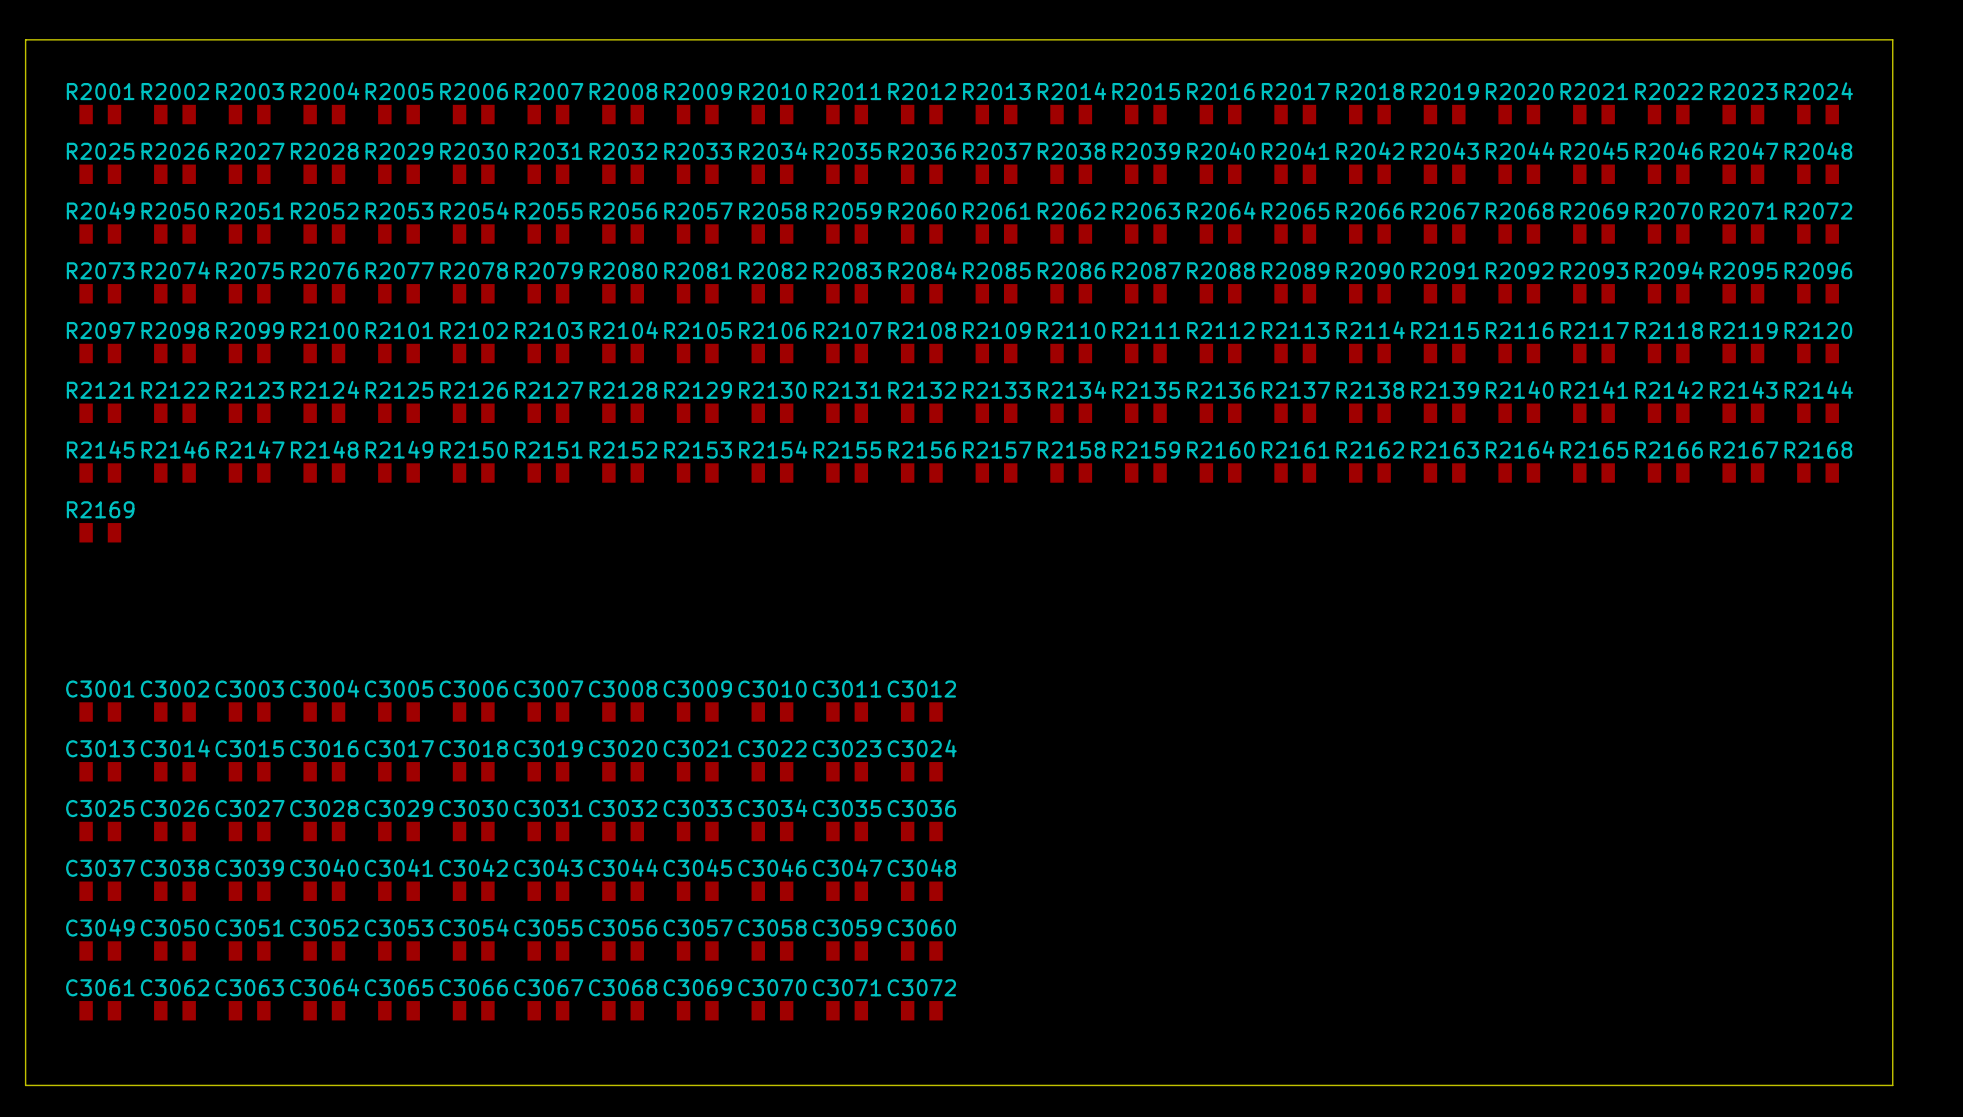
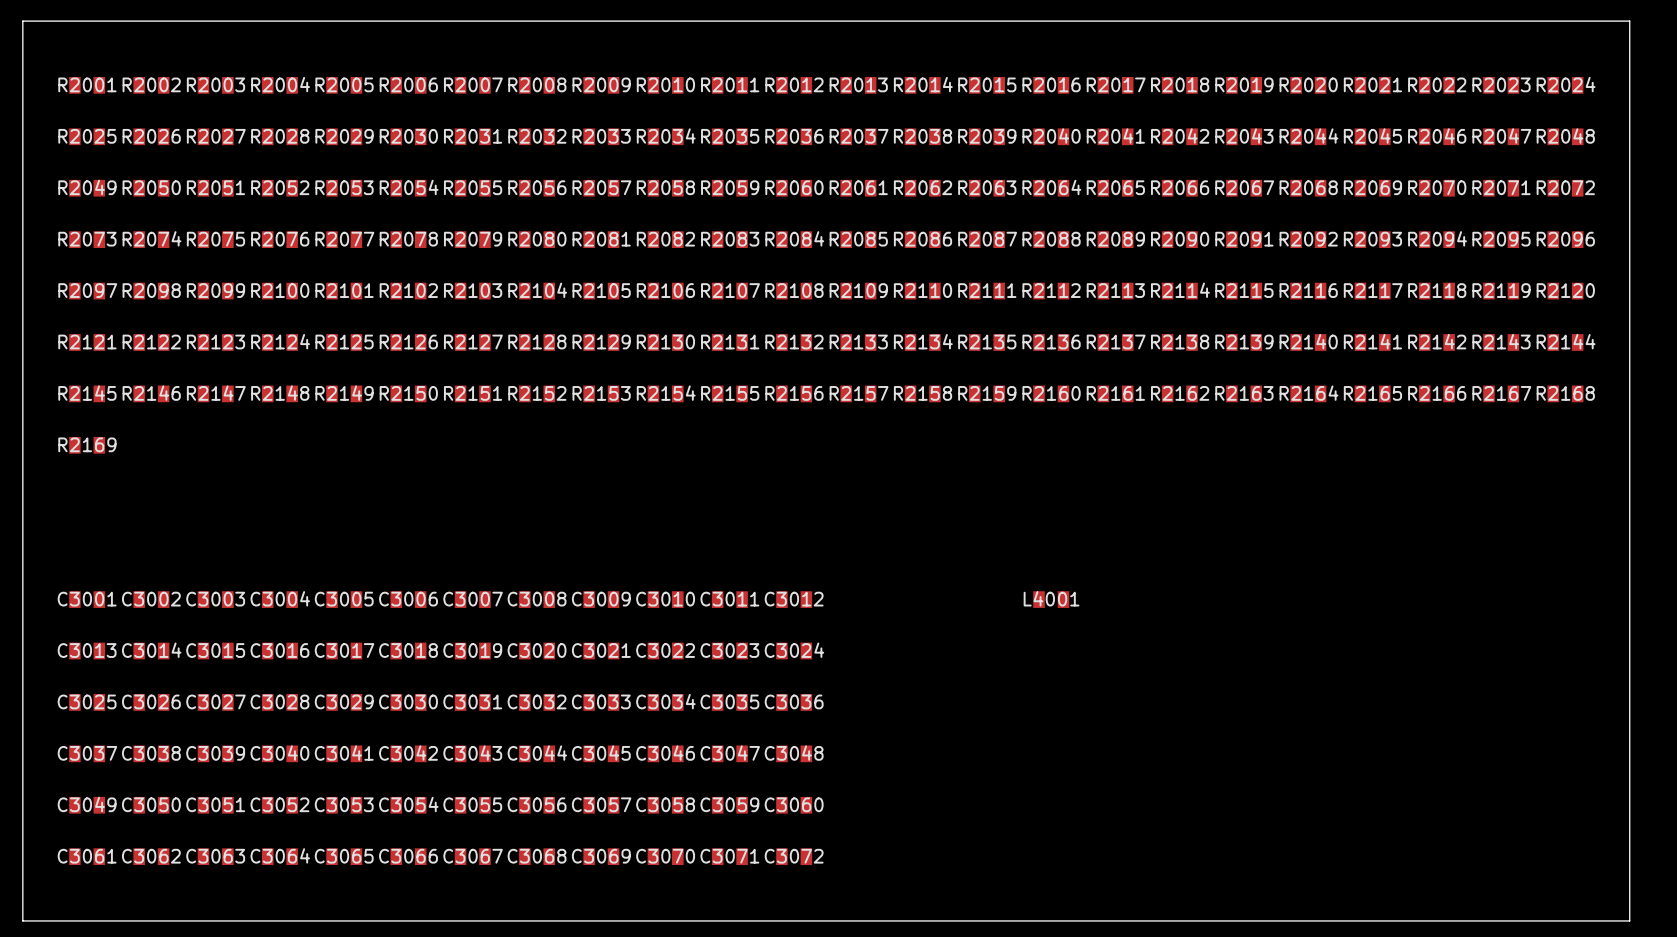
R2001 name position: R2001 (100, 91) -> R2001 (87, 84)
R2002 name position: R2002 (175, 91) -> R2002 (151, 84)
R2003 name position: R2003 (250, 91) -> R2003 (215, 84)
R2004 name position: R2004 (325, 91) -> R2004 (280, 84)
R2005 name position: R2005 (399, 91) -> R2005 (344, 84)
R2006 name position: R2006 (474, 91) -> R2006 (408, 84)
R2007 name position: R2007 (549, 91) -> R2007 (473, 84)
R2008 name position: R2008 (623, 91) -> R2008 (537, 84)
R2009 name position: R2009 (698, 91) -> R2009 (601, 84)
R2010 name position: R2010 (772, 91) -> R2010 (665, 84)
R2011 name position: R2011 (847, 91) -> R2011 (730, 84)
R2012 name position: R2012 (922, 91) -> R2012 (794, 84)
R2013 name position: R2013 (996, 91) -> R2013 (858, 84)
R2014 name position: R2014 (1071, 91) -> R2014 (923, 84)
R2015 name position: R2015 (1146, 91) -> R2015 (987, 84)
R2016 name position: R2016 (1220, 91) -> R2016 (1051, 84)
R2017 name position: R2017 (1295, 91) -> R2017 (1116, 84)
R2018 name position: R2018 (1370, 91) -> R2018 (1180, 84)
R2019 name position: R2019 (1444, 91) -> R2019 (1244, 84)
R2020 name position: R2020 (1519, 91) -> R2020 (1308, 84)
R2021 name position: R2021 (1594, 91) -> R2021 (1372, 84)
R2022 name position: R2022 (1669, 91) -> R2022 (1437, 84)
R2023 name position: R2023 (1743, 91) -> R2023 (1501, 84)
R2024 name position: R2024 (1818, 91) -> R2024 (1566, 84)
R2034 name position: R2034 (773, 150) -> R2034 (666, 136)
R2040 name position: R2040 (1220, 150) -> R2040 (1051, 136)
R2041 name position: R2041 (1295, 150) -> R2041 (1115, 136)
R2042 name position: R2042 (1370, 150) -> R2042 (1180, 136)
R2043 name position: R2043 (1444, 150) -> R2043 (1244, 136)
R2044 name position: R2044 (1520, 150) -> R2044 (1308, 136)
R2045 name position: R2045 (1594, 150) -> R2045 (1372, 136)
R2046 name position: R2046 (1669, 150) -> R2046 (1437, 136)
R2047 name position: R2047 (1744, 150) -> R2047 (1501, 136)
R2048 name position: R2048 (1818, 150) -> R2048 (1565, 136)
R2025 name position: R2025 (100, 151) -> R2025 (87, 136)
R2026 name position: R2026 (175, 151) -> R2026 (151, 136)
R2027 name position: R2027 (250, 151) -> R2027 (216, 136)
R2028 name position: R2028 (324, 151) -> R2028 (280, 136)
R2029 name position: R2029 (399, 151) -> R2029 (344, 136)
R2030 name position: R2030 (474, 151) -> R2030 (408, 136)
R2031 name position: R2031 (548, 151) -> R2031 (473, 136)
R2032 name position: R2032 (623, 151) -> R2032 (537, 136)
R2033 name position: R2033 (698, 151) -> R2033 (601, 136)
R2035 name position: R2035 (847, 151) -> R2035 (730, 136)
R2036 name position: R2036 (922, 151) -> R2036 (794, 136)
R2037 name position: R2037 (997, 151) -> R2037 (859, 136)
R2038 name position: R2038 (1071, 151) -> R2038 (923, 136)
R2039 name position: R2039 (1146, 151) -> R2039 (987, 136)
R2049 name position: R2049 (100, 210) -> R2049 (87, 187)
R2054 name position: R2054 (474, 210) -> R2054 (409, 187)
R2064 name position: R2064 (1221, 210) -> R2064 (1051, 187)
R2050 name position: R2050 (175, 211) -> R2050 (151, 187)
R2051 name position: R2051 (250, 211) -> R2051 (215, 187)
R2052 name position: R2052 (324, 211) -> R2052 (280, 187)
R2053 name position: R2053 (399, 211) -> R2053 (344, 187)
R2055 name position: R2055 (548, 211) -> R2055 (473, 187)
R2056 name position: R2056 (623, 211) -> R2056 (537, 187)
R2057 name position: R2057 (698, 211) -> R2057 (601, 187)
R2058 name position: R2058 (772, 211) -> R2058 (665, 187)
R2059 name position: R2059 (847, 211) -> R2059 (730, 187)
R2060 name position: R2060 (922, 211) -> R2060 (794, 187)
R2061 name position: R2061 (996, 211) -> R2061 (858, 187)
R2062 name position: R2062 (1071, 211) -> R2062 (923, 187)
R2063 name position: R2063 (1146, 211) -> R2063 (987, 187)
R2065 name position: R2065 (1295, 211) -> R2065 (1115, 187)
R2066 name position: R2066 (1370, 211) -> R2066 (1180, 187)
R2067 name position: R2067 (1445, 211) -> R2067 (1244, 187)
R2068 name position: R2068 (1519, 211) -> R2068 (1308, 187)
R2069 name position: R2069 (1594, 211) -> R2069 (1372, 187)
R2070 name position: R2070 (1669, 211) -> R2070 (1437, 187)
R2071 name position: R2071 (1743, 211) -> R2071 (1501, 187)
R2072 name position: R2072 (1818, 211) -> R2072 (1565, 187)
R2073 name position: R2073 (100, 270) -> R2073 (87, 239)
R2074 name position: R2074 (175, 270) -> R2074 (152, 238)
R2075 name position: R2075 (250, 270) -> R2075 (215, 239)
R2076 name position: R2076 (324, 270) -> R2076 (280, 239)
R2077 name position: R2077 (399, 270) -> R2077 (344, 239)
R2078 name position: R2078 (474, 270) -> R2078 (408, 239)
R2079 name position: R2079 (548, 270) -> R2079 (473, 239)
R2080 name position: R2080 (623, 270) -> R2080 (537, 239)
R2081 name position: R2081 (698, 270) -> R2081 (601, 239)
R2082 name position: R2082 (772, 270) -> R2082 (665, 239)
R2083 name position: R2083 (847, 270) -> R2083 (730, 239)
R2084 name position: R2084 (922, 270) -> R2084 (794, 238)
R2085 name position: R2085 (996, 270) -> R2085 (858, 239)
R2086 name position: R2086 (1071, 270) -> R2086 (923, 239)
R2087 name position: R2087 (1146, 270) -> R2087 (987, 239)
R2088 name position: R2088 (1220, 270) -> R2088 (1051, 239)
R2089 name position: R2089 (1295, 270) -> R2089 (1115, 239)
R2090 name position: R2090 (1370, 270) -> R2090 (1180, 239)
R2091 name position: R2091 (1444, 270) -> R2091 (1244, 239)
R2092 name position: R2092 (1519, 270) -> R2092 (1308, 239)
R2093 name position: R2093 (1594, 270) -> R2093 (1372, 239)
R2094 name position: R2094 (1669, 270) -> R2094 (1437, 238)
R2095 name position: R2095 (1743, 270) -> R2095 (1501, 239)
R2096 name position: R2096 (1818, 270) -> R2096 (1565, 239)
R2097 name position: R2097 (101, 330) -> R2097 (87, 290)
R2098 name position: R2098 (175, 330) -> R2098 (151, 290)
R2099 name position: R2099 (250, 330) -> R2099 (215, 290)
R2100 name position: R2100 (324, 330) -> R2100 (280, 290)
R2101 name position: R2101 (399, 330) -> R2101 (344, 290)
R2102 name position: R2102 (474, 330) -> R2102 (408, 290)
R2103 name position: R2103 (548, 330) -> R2103 (473, 290)
R2104 name position: R2104 (623, 330) -> R2104 (537, 290)
R2105 name position: R2105 (698, 330) -> R2105 (601, 290)
R2106 name position: R2106 (772, 330) -> R2106 (665, 290)
R2107 name position: R2107 (847, 330) -> R2107 (730, 290)
R2108 name position: R2108 (922, 330) -> R2108 (794, 290)
R2109 name position: R2109 (996, 330) -> R2109 (858, 290)
R2110 name position: R2110 (1071, 330) -> R2110 (923, 290)
R2111 name position: R2111 (1146, 330) -> R2111 (987, 290)
R2112 name position: R2112 (1220, 330) -> R2112 (1051, 290)
R2113 name position: R2113 (1295, 330) -> R2113 (1115, 290)
R2114 name position: R2114 (1370, 330) -> R2114 (1180, 290)
R2115 name position: R2115 (1444, 330) -> R2115 (1244, 290)
R2116 name position: R2116 (1519, 330) -> R2116 (1308, 290)
R2117 name position: R2117 (1594, 330) -> R2117 (1373, 290)
R2118 name position: R2118 (1669, 330) -> R2118 (1437, 290)
R2119 name position: R2119 (1743, 330) -> R2119 (1501, 290)
R2120 name position: R2120 (1818, 330) -> R2120 (1565, 290)
R2124 name position: R2124 (325, 389) -> R2124 (280, 341)
R2134 name position: R2134 (1071, 389) -> R2134 (923, 341)
R2140 name position: R2140 (1519, 389) -> R2140 (1308, 341)
R2141 name position: R2141 (1594, 389) -> R2141 (1372, 341)
R2142 name position: R2142 (1669, 389) -> R2142 (1437, 341)
R2143 name position: R2143 (1743, 389) -> R2143 (1501, 341)
R2144 name position: R2144 (1818, 389) -> R2144 (1566, 341)
R2121 name position: R2121 (100, 390) -> R2121 (87, 342)
R2122 name position: R2122 (175, 390) -> R2122 (151, 342)
R2123 name position: R2123 (250, 390) -> R2123 (215, 342)
R2125 name position: R2125 (399, 390) -> R2125 (344, 342)
R2126 name position: R2126 (474, 390) -> R2126 (408, 342)
R2127 name position: R2127 (549, 390) -> R2127 (473, 342)
R2128 name position: R2128 (623, 390) -> R2128 (537, 342)
R2129 name position: R2129 (698, 390) -> R2129 (601, 342)
R2130 name position: R2130 (772, 390) -> R2130 (665, 342)
R2131 name position: R2131 (847, 390) -> R2131 (730, 342)
R2132 name position: R2132 (922, 390) -> R2132 (794, 342)
R2133 name position: R2133 (996, 390) -> R2133 (858, 342)
R2135 name position: R2135 (1146, 390) -> R2135 (987, 342)
R2136 name position: R2136 (1220, 390) -> R2136 (1051, 342)
R2137 name position: R2137 (1295, 390) -> R2137 (1116, 342)
R2138 name position: R2138 (1370, 390) -> R2138 (1180, 342)
R2139 name position: R2139 (1444, 390) -> R2139 (1244, 342)
R2145 name position: R2145 (100, 449) -> R2145 (87, 393)
R2146 name position: R2146 (175, 449) -> R2146 (151, 393)
R2147 name position: R2147 (250, 449) -> R2147 (216, 393)
R2148 name position: R2148 (324, 449) -> R2148 (280, 393)
R2149 name position: R2149 (399, 449) -> R2149 (344, 393)
R2154 name position: R2154 (773, 449) -> R2154 (666, 393)
R2164 name position: R2164 (1520, 449) -> R2164 (1308, 393)
R2150 name position: R2150 (474, 450) -> R2150 (408, 393)
R2151 name position: R2151 (548, 450) -> R2151 (473, 393)
R2152 name position: R2152 (623, 450) -> R2152 (537, 393)
R2153 name position: R2153 (698, 450) -> R2153 (601, 393)
R2155 name position: R2155 (847, 450) -> R2155 (730, 393)
R2156 name position: R2156 (922, 450) -> R2156 (794, 393)
R2157 name position: R2157 (997, 450) -> R2157 (859, 393)
R2158 name position: R2158 (1071, 450) -> R2158 (923, 393)
R2159 name position: R2159 (1146, 450) -> R2159 (987, 393)
R2160 name position: R2160 (1220, 450) -> R2160 (1051, 393)
R2161 name position: R2161 (1295, 450) -> R2161 (1115, 393)
R2162 name position: R2162 (1370, 450) -> R2162 (1180, 393)
R2163 name position: R2163 (1444, 450) -> R2163 (1244, 393)
R2165 name position: R2165 (1594, 450) -> R2165 (1372, 393)
R2166 name position: R2166 (1669, 450) -> R2166 (1437, 393)
R2167 name position: R2167 (1744, 450) -> R2167 (1501, 393)
R2168 name position: R2168 (1818, 450) -> R2168 (1565, 393)
R2169 name position: R2169 (100, 509) -> R2169 (87, 444)
C3004 name position: C3004 (324, 688) -> C3004 (280, 598)
C3001 name position: C3001 (100, 689) -> C3001 (87, 599)
C3002 name position: C3002 (174, 689) -> C3002 (151, 599)
C3003 name position: C3003 (249, 689) -> C3003 (215, 599)
C3005 name position: C3005 (399, 689) -> C3005 (344, 599)
C3006 name position: C3006 (473, 689) -> C3006 (408, 599)
C3007 name position: C3007 (548, 689) -> C3007 (473, 599)
C3008 name position: C3008 (623, 689) -> C3008 (537, 599)
C3009 name position: C3009 (697, 689) -> C3009 (601, 599)
C3010 name position: C3010 (772, 689) -> C3010 (665, 599)
C3011 name position: C3011 (847, 689) -> C3011 (729, 599)
C3012 name position: C3012 (921, 689) -> C3012 (794, 599)
L4001: none -> (1051, 599)
C3013 name position: C3013 (100, 748) -> C3013 (87, 650)
C3014 name position: C3014 (175, 748) -> C3014 (151, 650)
C3015 name position: C3015 (249, 748) -> C3015 (215, 650)
C3016 name position: C3016 (324, 748) -> C3016 (279, 650)
C3017 name position: C3017 (399, 748) -> C3017 (344, 650)
C3018 name position: C3018 (473, 748) -> C3018 (408, 650)
C3019 name position: C3019 (548, 748) -> C3019 (472, 650)
C3020 name position: C3020 (623, 748) -> C3020 (537, 650)
C3021 name position: C3021 (697, 748) -> C3021 (601, 650)
C3022 name position: C3022 (772, 748) -> C3022 (665, 650)
C3023 name position: C3023 (847, 748) -> C3023 (729, 650)
C3024 name position: C3024 (922, 748) -> C3024 (794, 650)
C3025 name position: C3025 (100, 808) -> C3025 (87, 701)
C3026 name position: C3026 (174, 808) -> C3026 (151, 701)
C3027 name position: C3027 (250, 808) -> C3027 (215, 701)
C3028 name position: C3028 (324, 808) -> C3028 (279, 701)
C3029 name position: C3029 (399, 808) -> C3029 (344, 701)
C3030 name position: C3030 (473, 808) -> C3030 (408, 701)
C3031 name position: C3031 (548, 808) -> C3031 (472, 701)
C3032 name position: C3032 (623, 808) -> C3032 (537, 701)
C3033 name position: C3033 (697, 808) -> C3033 (601, 701)
C3034 name position: C3034 (772, 808) -> C3034 (665, 701)
C3035 name position: C3035 (847, 808) -> C3035 (729, 701)
C3036 name position: C3036 (921, 808) -> C3036 (794, 701)
C3040 name position: C3040 (324, 867) -> C3040 (279, 753)
C3041 name position: C3041 (399, 867) -> C3041 (344, 753)
C3042 name position: C3042 (473, 867) -> C3042 (408, 753)
C3043 name position: C3043 (548, 867) -> C3043 (472, 753)
C3044 name position: C3044 (623, 867) -> C3044 (537, 753)
C3045 name position: C3045 (697, 867) -> C3045 (601, 753)
C3046 name position: C3046 (772, 867) -> C3046 (665, 753)
C3047 name position: C3047 (847, 867) -> C3047 (730, 753)
C3048 name position: C3048 (921, 867) -> C3048 (794, 753)
C3037 name position: C3037 (100, 868) -> C3037 (87, 753)
C3038 name position: C3038 (174, 868) -> C3038 (151, 753)
C3039 name position: C3039 (249, 868) -> C3039 (215, 753)
C3049 name position: C3049 (100, 927) -> C3049 (87, 804)
C3054 name position: C3054 (474, 927) -> C3054 (408, 804)
C3050 name position: C3050 (174, 928) -> C3050 (151, 804)
C3051 name position: C3051 (249, 928) -> C3051 (215, 804)
C3052 name position: C3052 (324, 928) -> C3052 (279, 804)
C3053 name position: C3053 (399, 928) -> C3053 (344, 804)
C3055 name position: C3055 (548, 928) -> C3055 (472, 804)
C3056 name position: C3056 (623, 928) -> C3056 (537, 804)
C3057 name position: C3057 (698, 928) -> C3057 (601, 804)
C3058 name position: C3058 (772, 928) -> C3058 (665, 804)
C3059 name position: C3059 (847, 928) -> C3059 (729, 804)
C3060 name position: C3060 (921, 928) -> C3060 (794, 804)
C3061 name position: C3061 (100, 987) -> C3061 (87, 856)
C3062 name position: C3062 (174, 987) -> C3062 (151, 856)
C3063 name position: C3063 (249, 987) -> C3063 (215, 856)
C3064 name position: C3064 (324, 987) -> C3064 (280, 855)
C3065 name position: C3065 (399, 987) -> C3065 (344, 856)
C3066 name position: C3066 (473, 987) -> C3066 (408, 856)
C3067 name position: C3067 (548, 987) -> C3067 (473, 856)
C3068 name position: C3068 (623, 987) -> C3068 (537, 856)
C3069 name position: C3069 (697, 987) -> C3069 (601, 856)
C3070 name position: C3070 (772, 987) -> C3070 (665, 856)
C3071 name position: C3071 (847, 987) -> C3071 (729, 856)
C3072 name position: C3072 (921, 987) -> C3072 (794, 856)

